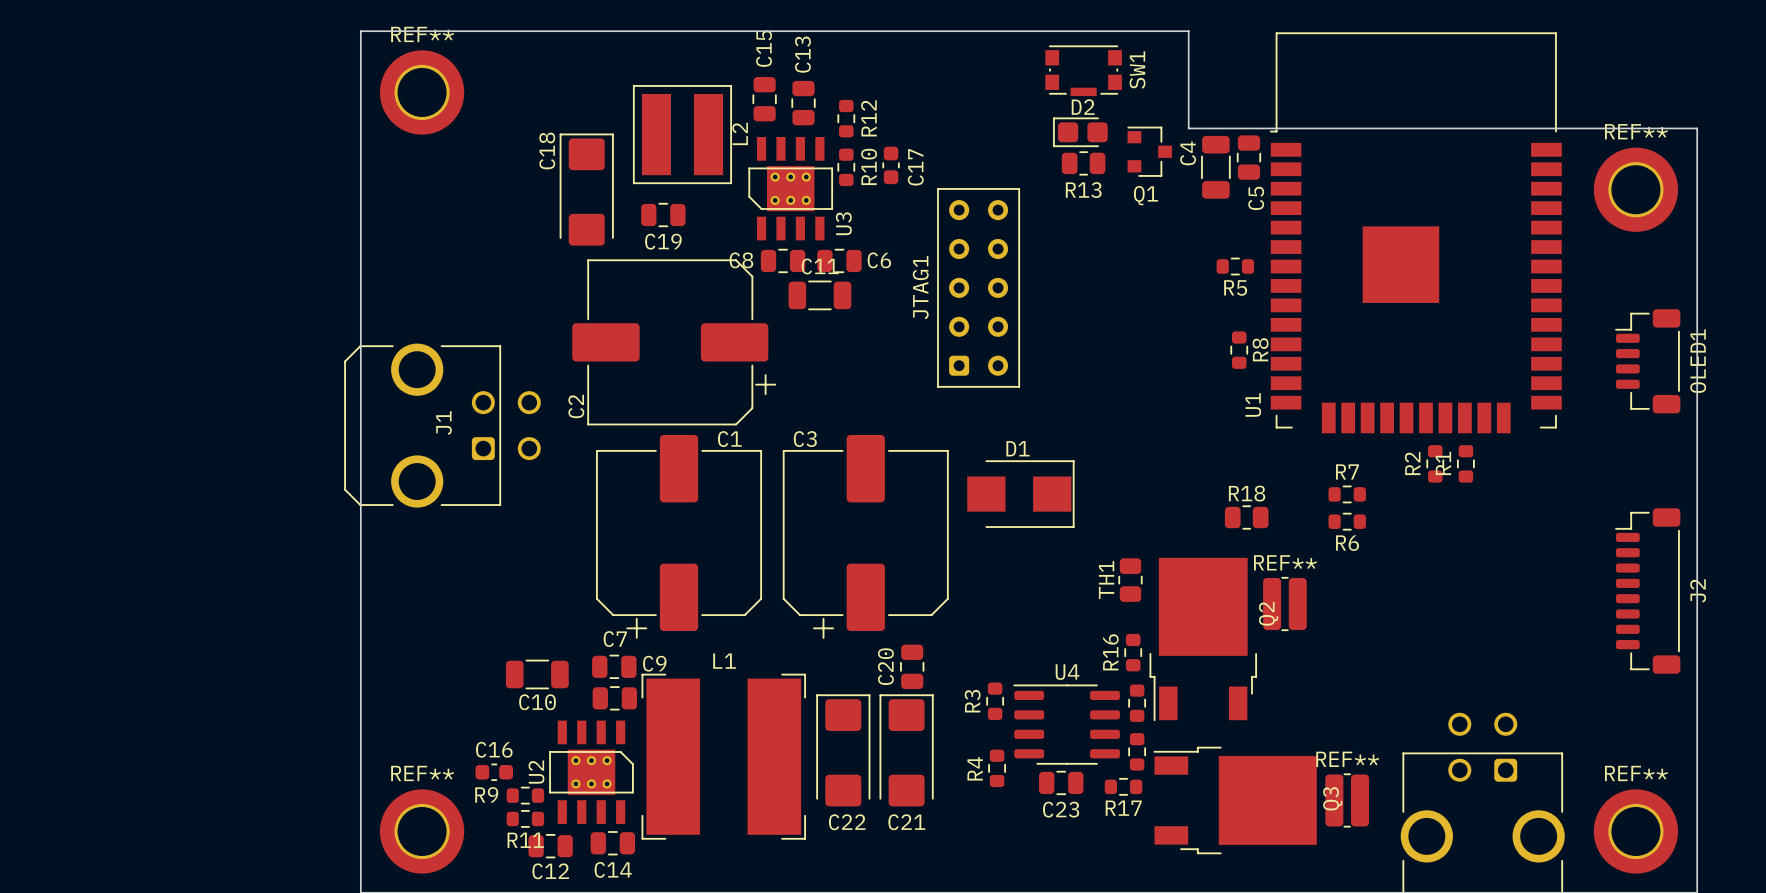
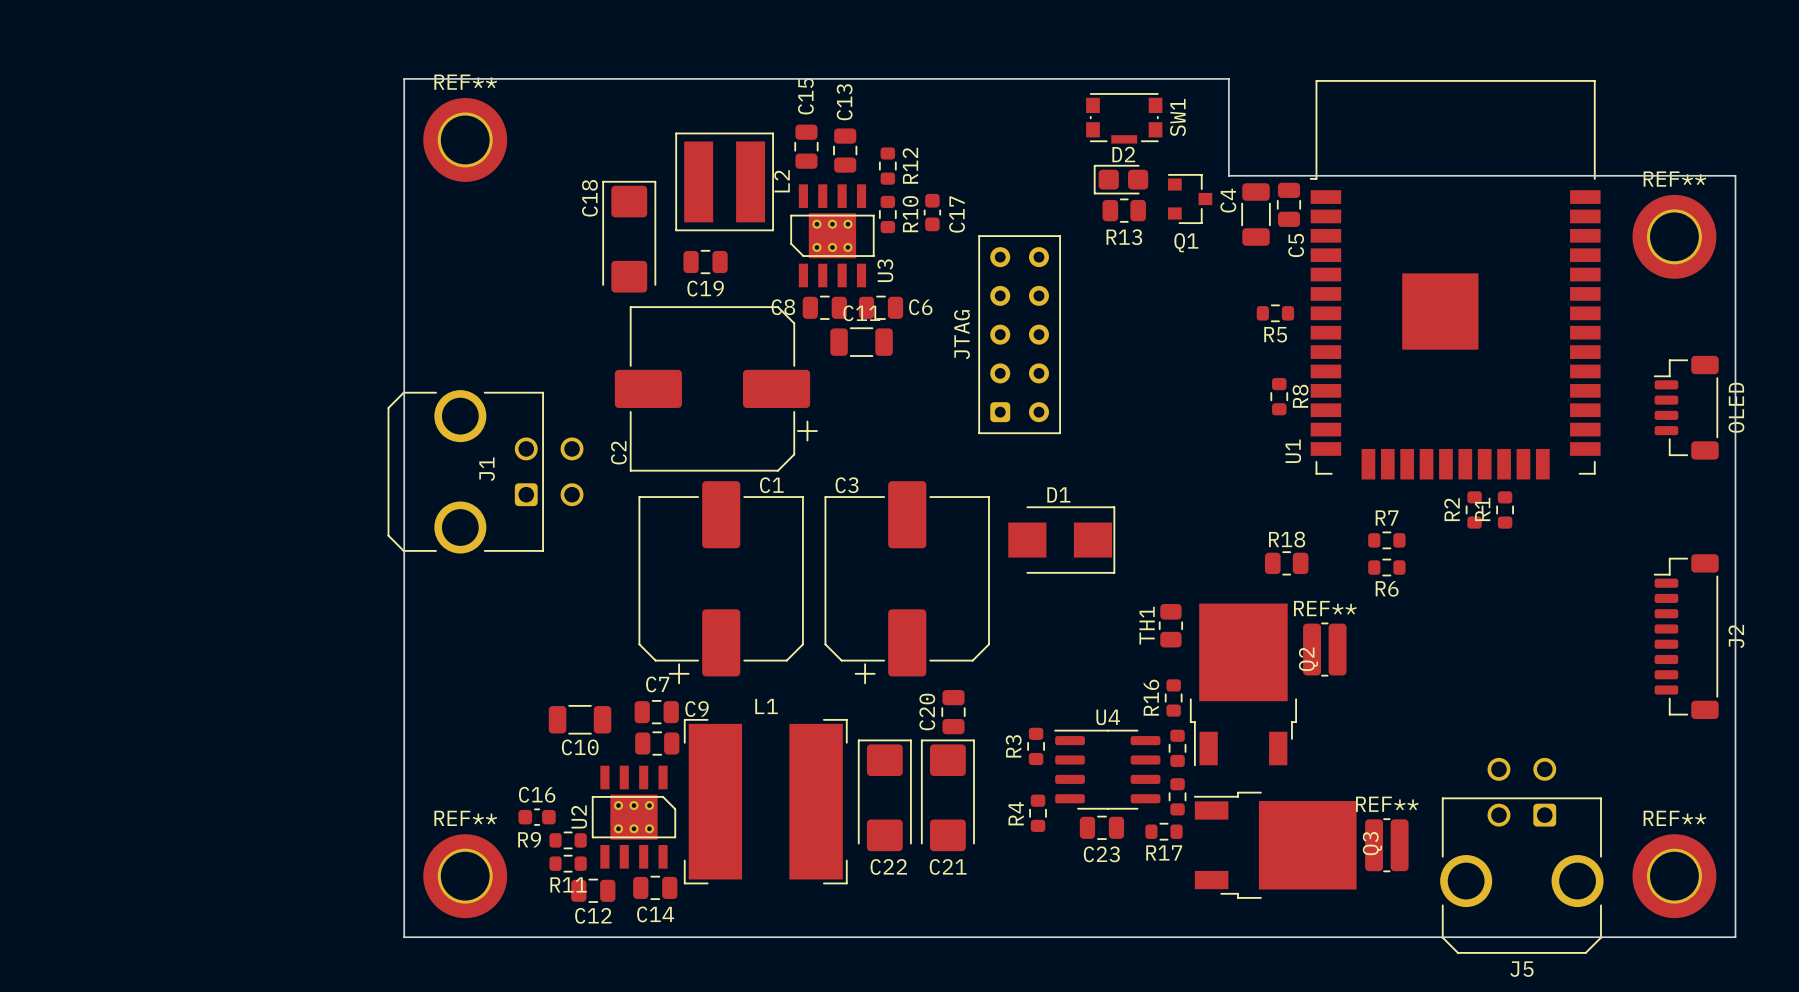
JTAG1 name: JTAG1 (920, 287) -> JTAG (961, 334)
OLED1 name: OLED1 (1698, 361) -> OLED (1736, 407)

